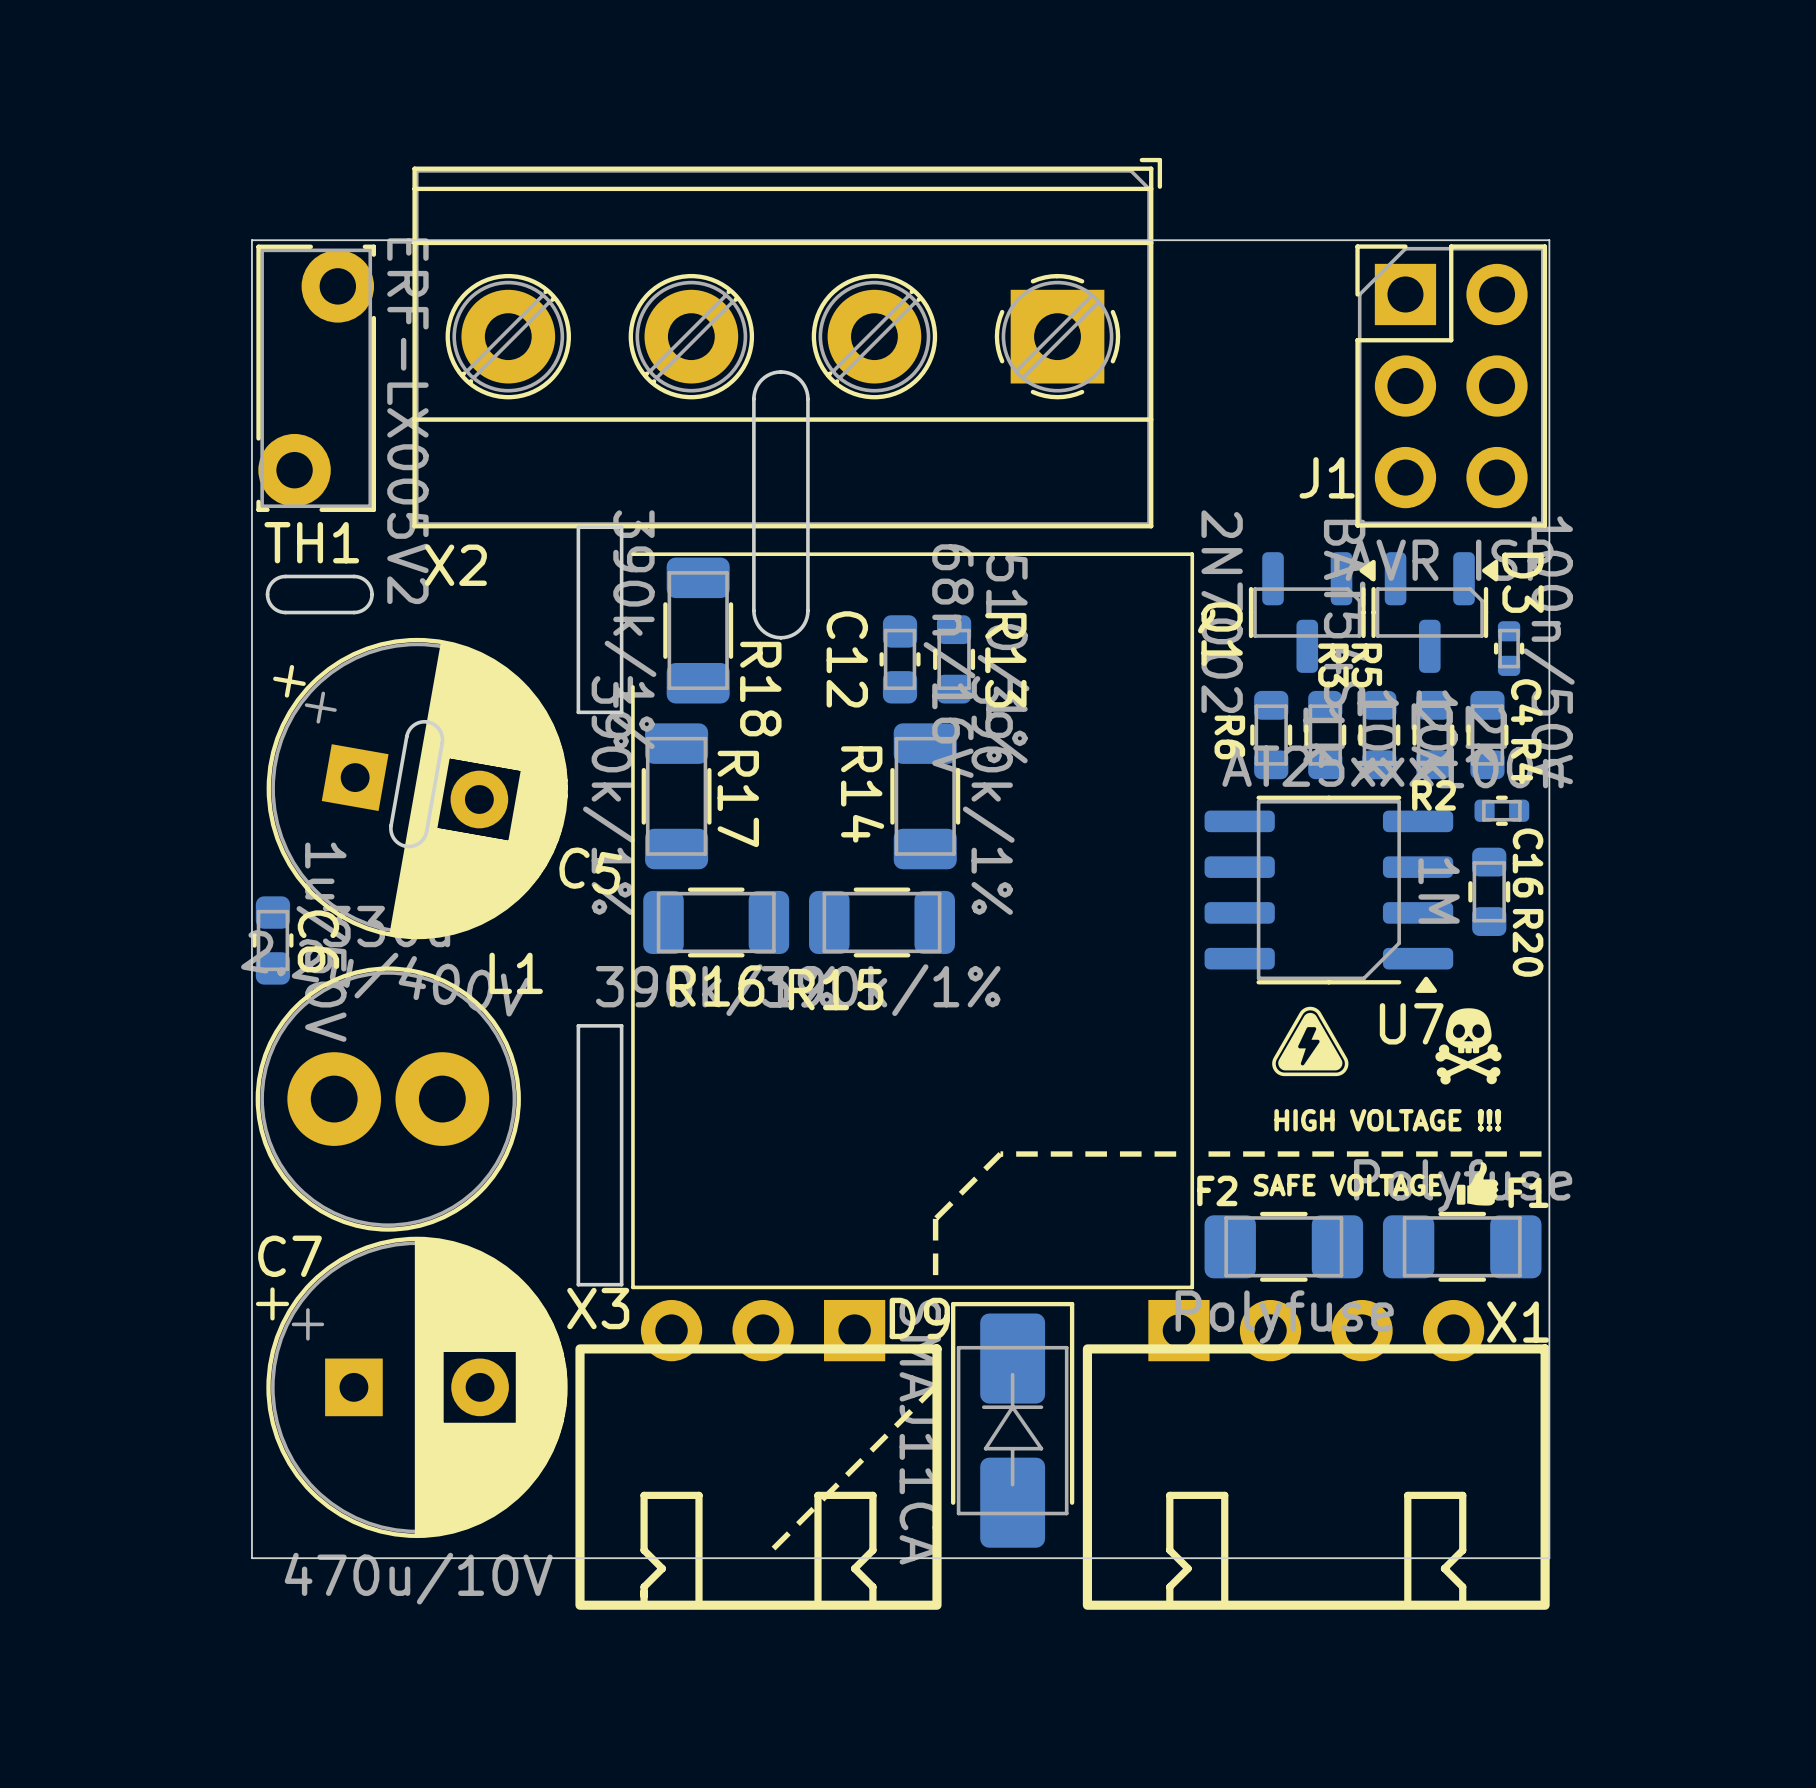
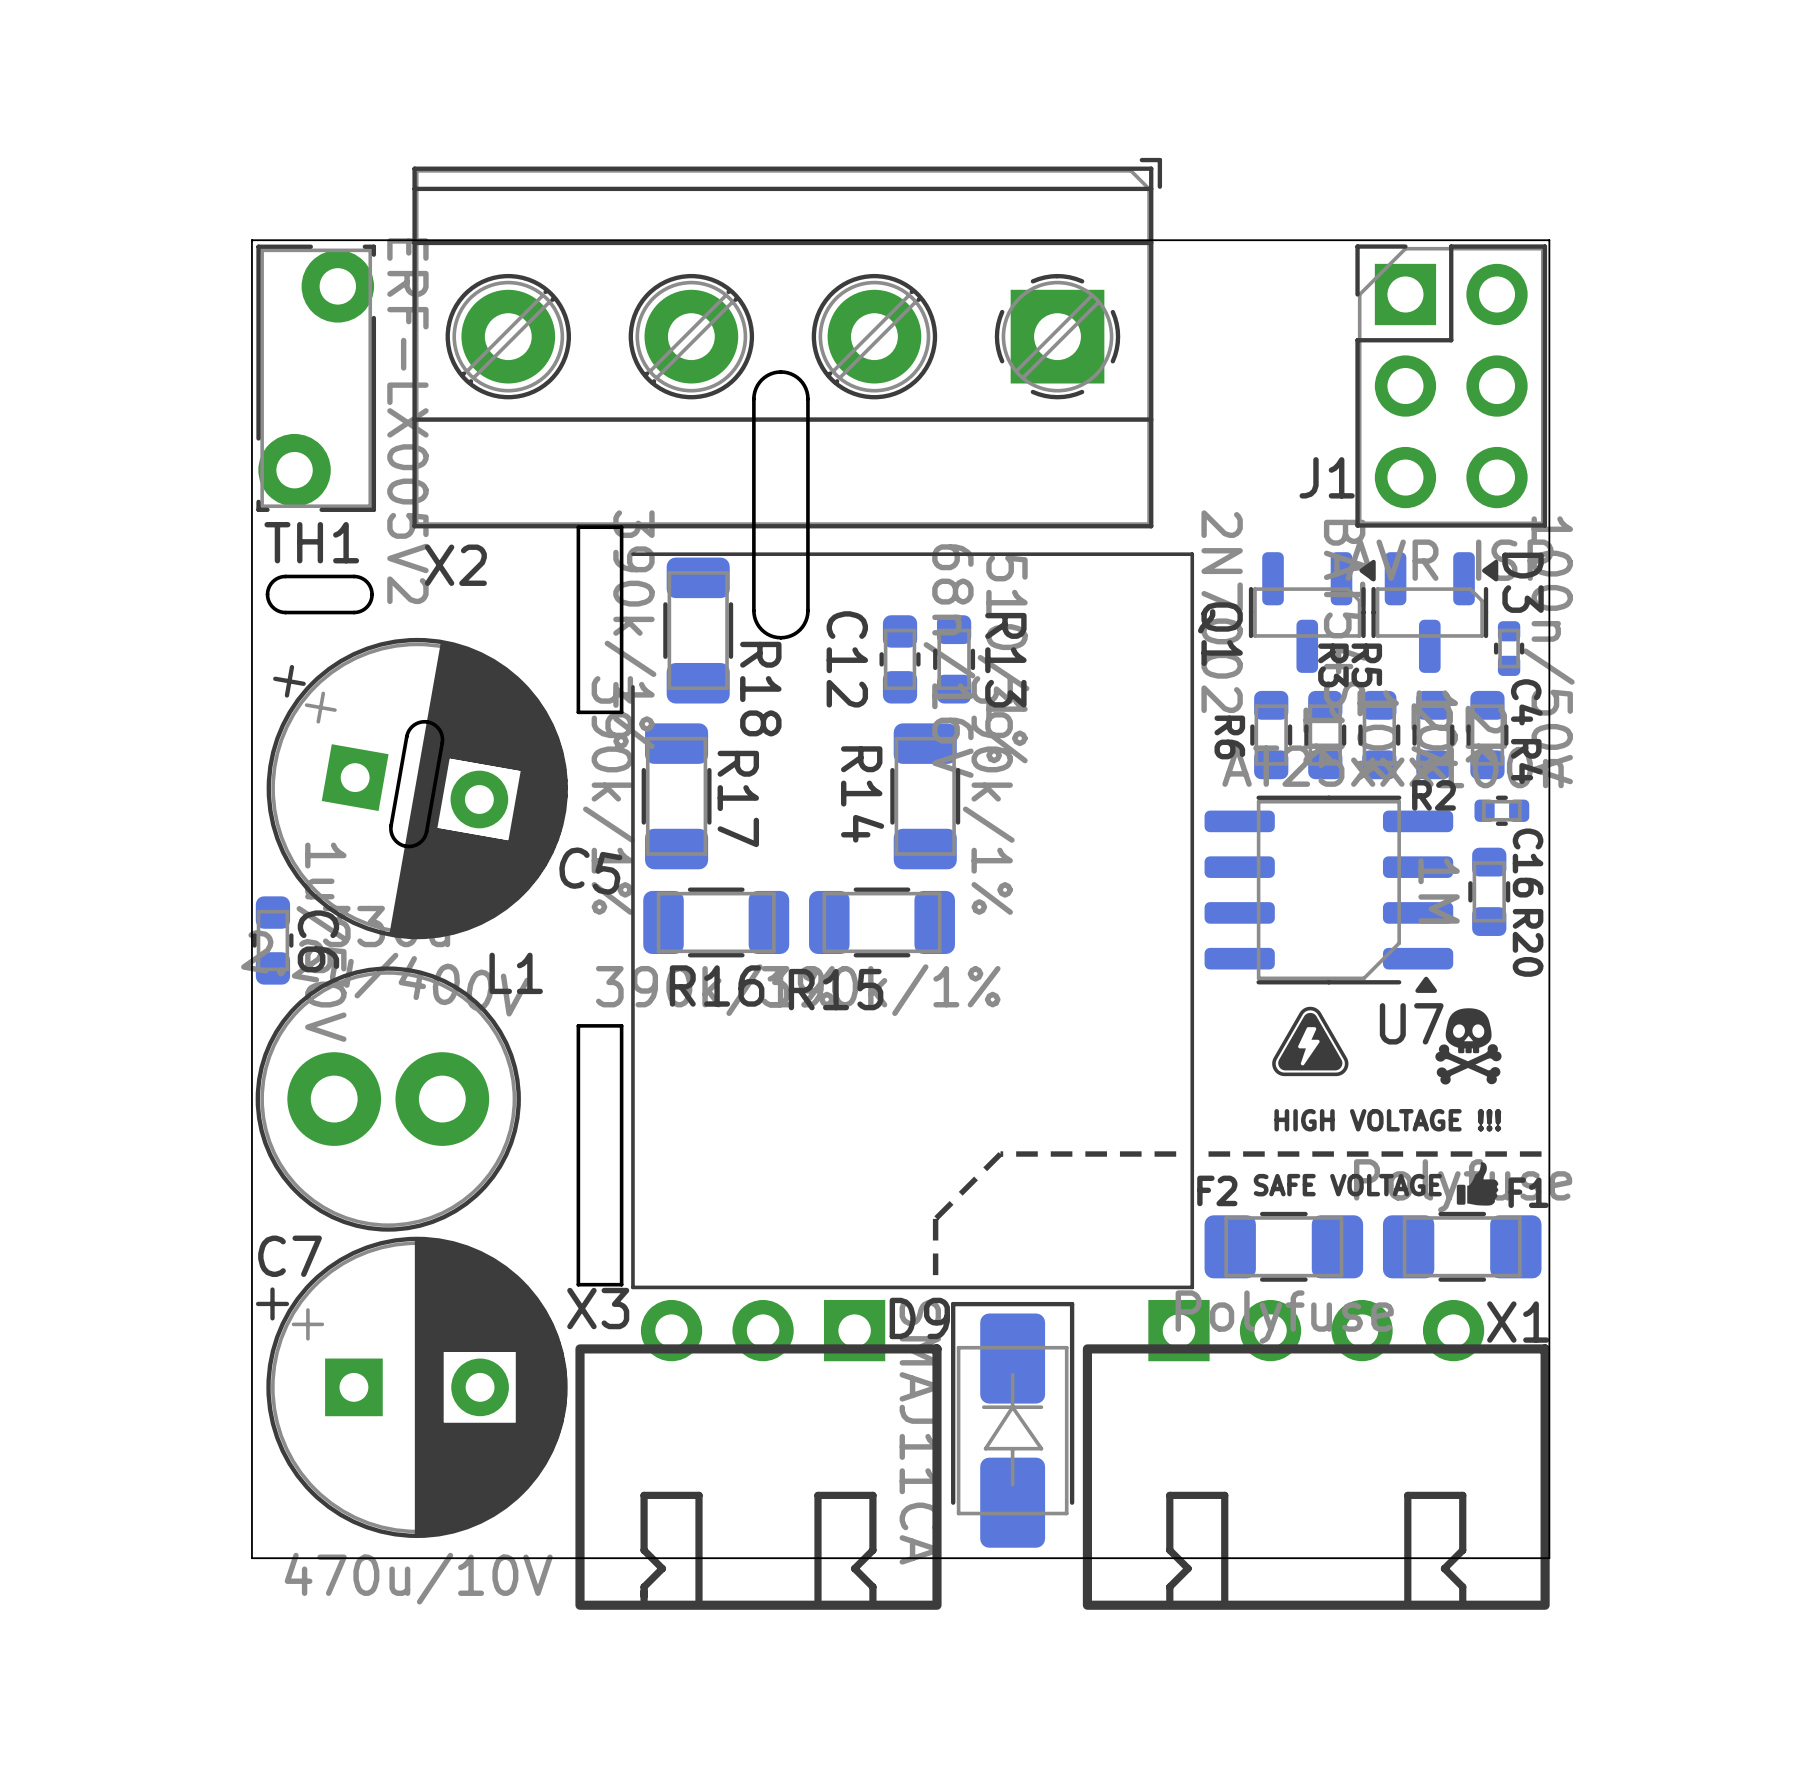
line: (935, 1386) (770, 1551) -> none

